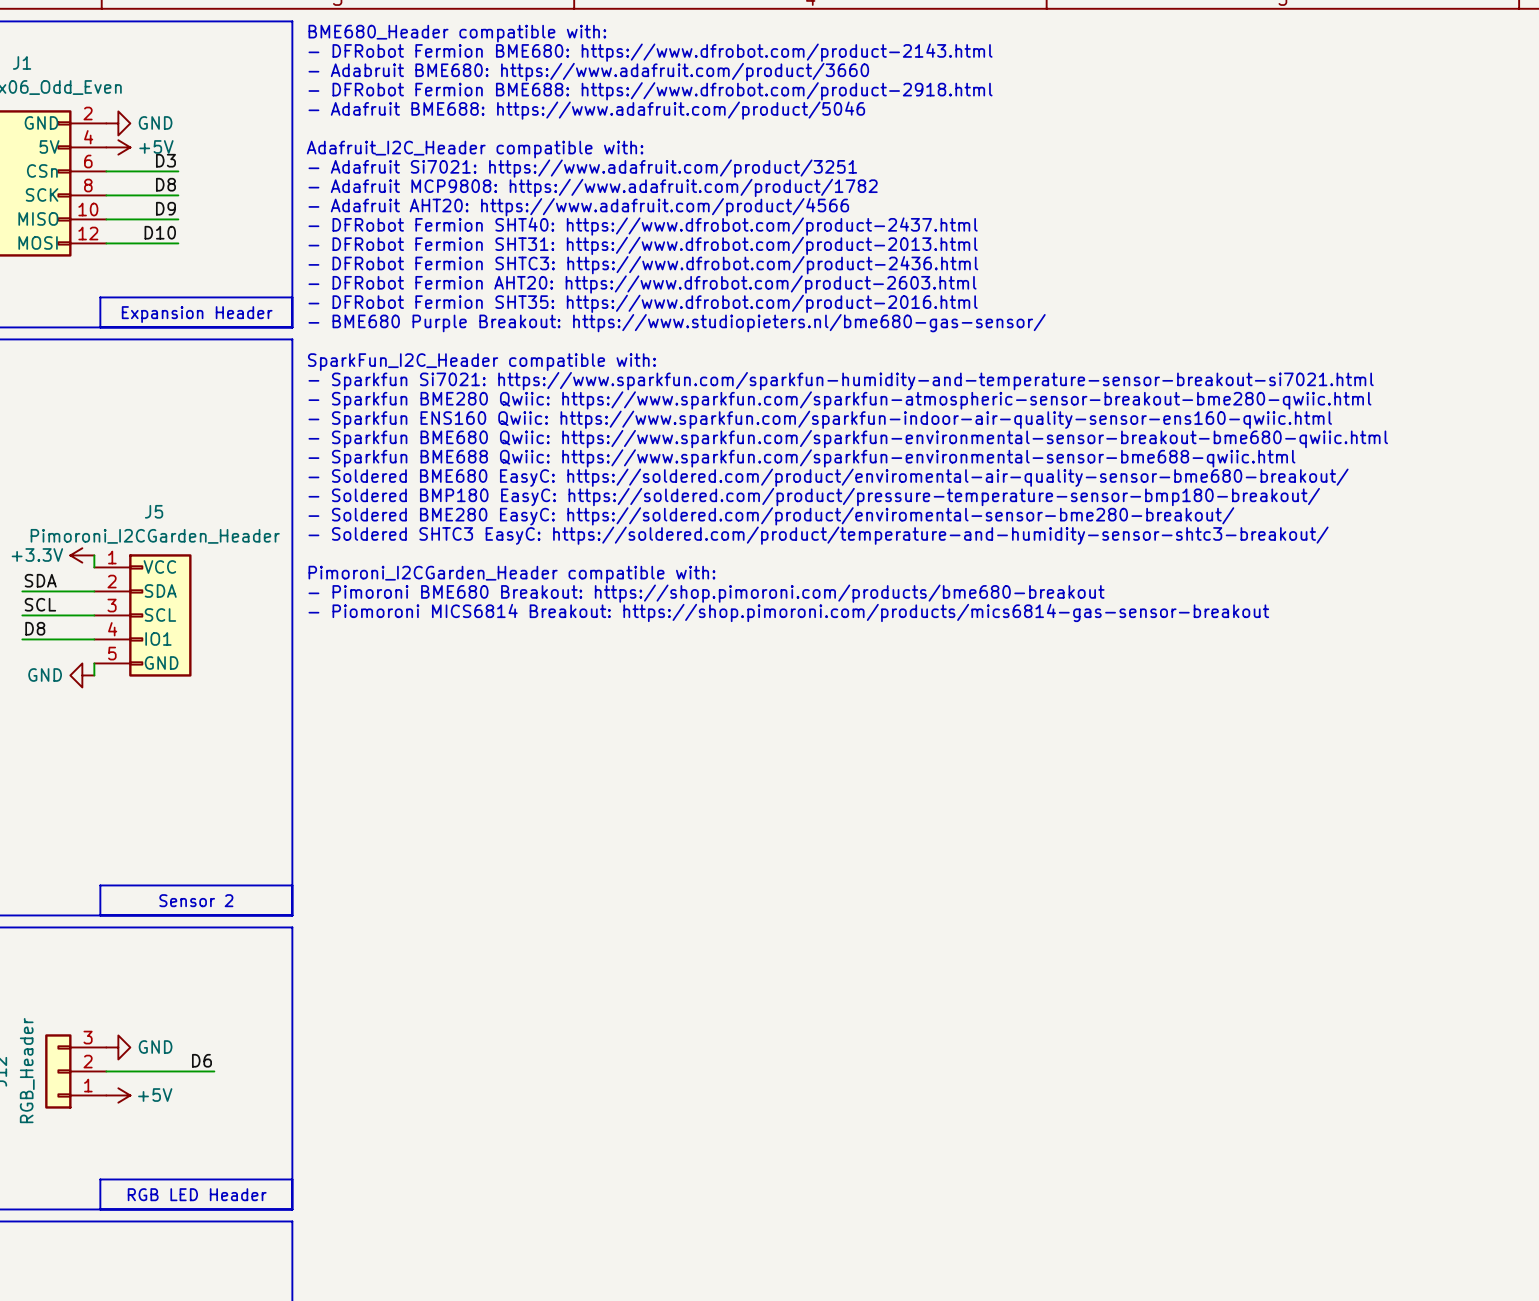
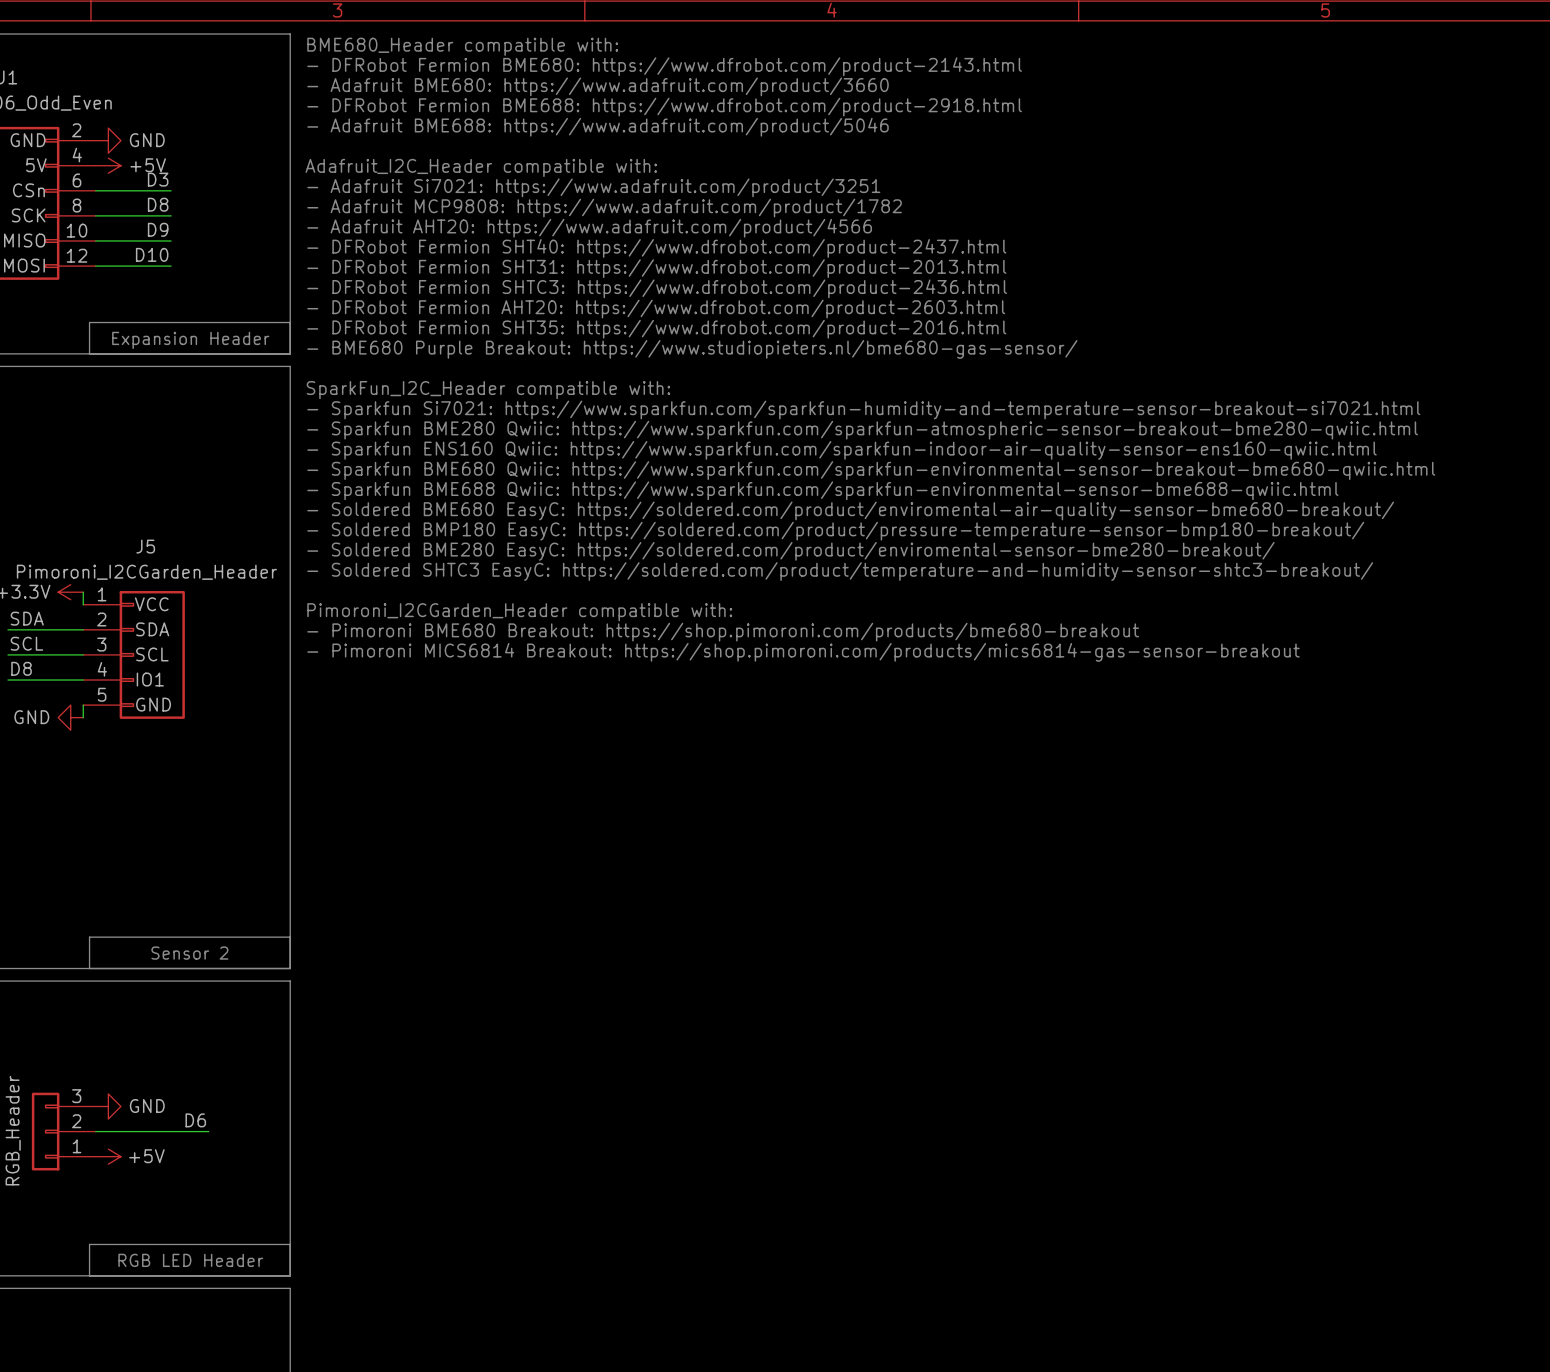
text: - Adabruit BME680: https://www.adafruit.com/product/3660 (588, 71) -> - Adafruit BME680: https://www.adafruit.com/product/3660 (598, 86)
text: - Piomoroni MICS6814 Breakout: https://shop.pimoroni.com/products/mics6814-gas-sensor-breakout (788, 612) -> - Pimoroni MICS6814 Breakout: https://shop.pimoroni.com/products/mics6814-gas-sensor-breakout (803, 652)

